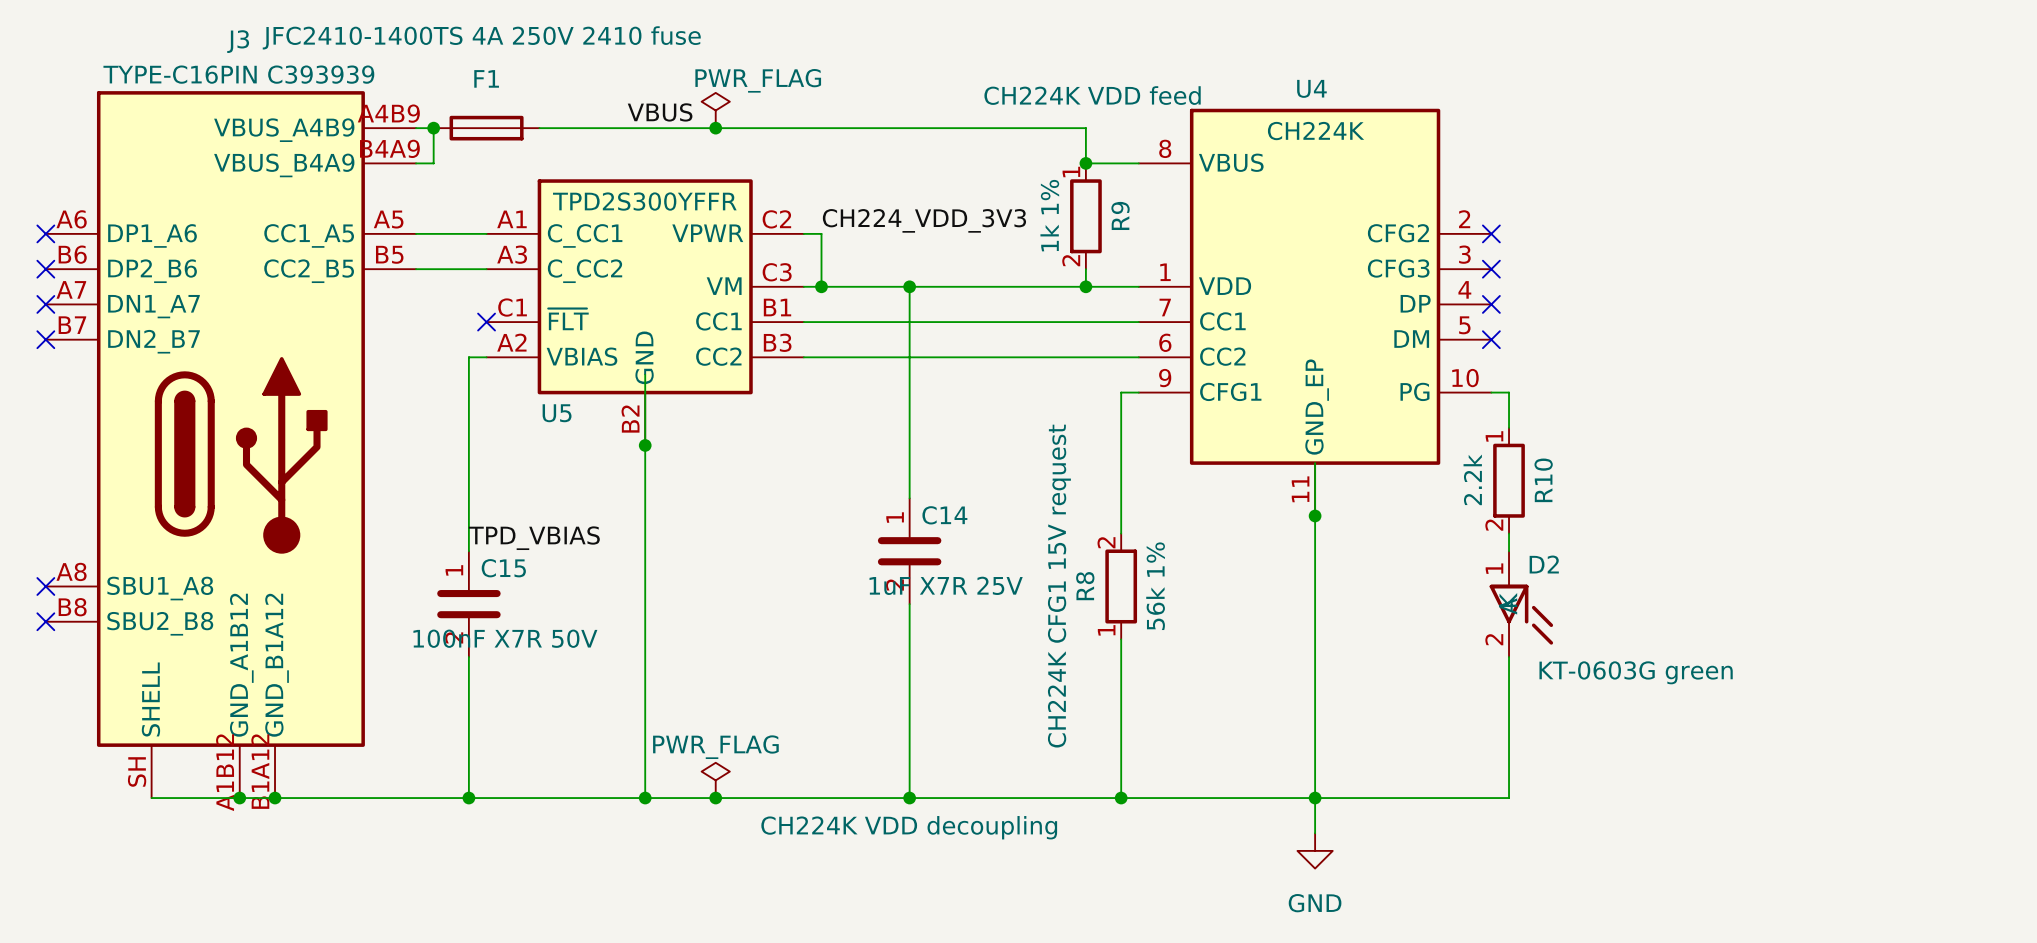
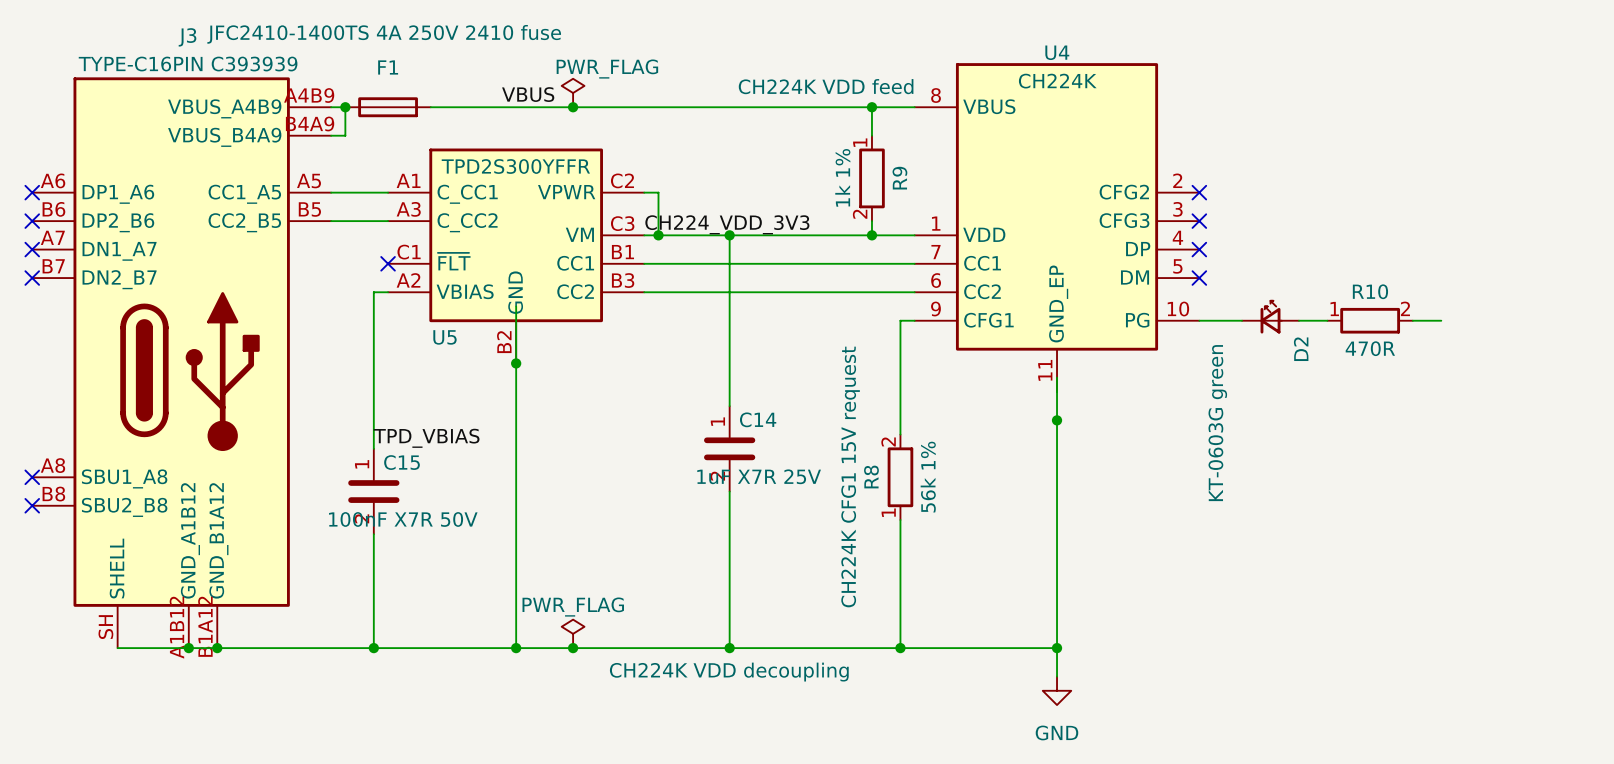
R9 text position: CH224K VDD feed (1092, 95) -> CH224K VDD feed (826, 86)
U4 symbol: [1138, 108, 1492, 516] -> [914, 63, 1200, 392]
wire: (1085, 163) (1138, 163) -> (871, 107) (914, 107)
junction position: (1085, 163) -> (871, 107)
label position: CH224_VDD_3V3 (924, 220) -> CH224_VDD_3V3 (727, 224)
wire: (1509, 392) (1509, 427) -> (1213, 320) (1242, 320)
wire: none -> (1298, 320) (1327, 320)
wire: none -> (1412, 320) (1441, 320)
R10 value: 2.2k (1472, 479) -> 470R (1370, 348)
R10 rotation: 0° (1509, 480) -> 90° counterclockwise (1370, 320)
R10 position: (1509, 480) -> (1370, 320)
wire: (1509, 533) (1509, 551) -> none
D2 symbol: [1489, 551, 1554, 658] -> [1242, 300, 1299, 334]
D2 name position: D2 (1544, 564) -> D2 (1301, 349)
wire: (1509, 657) (1509, 798) (1315, 798) -> none
D2 value position: KT-0603G green (1636, 672) -> KT-0603G green (1217, 423)

